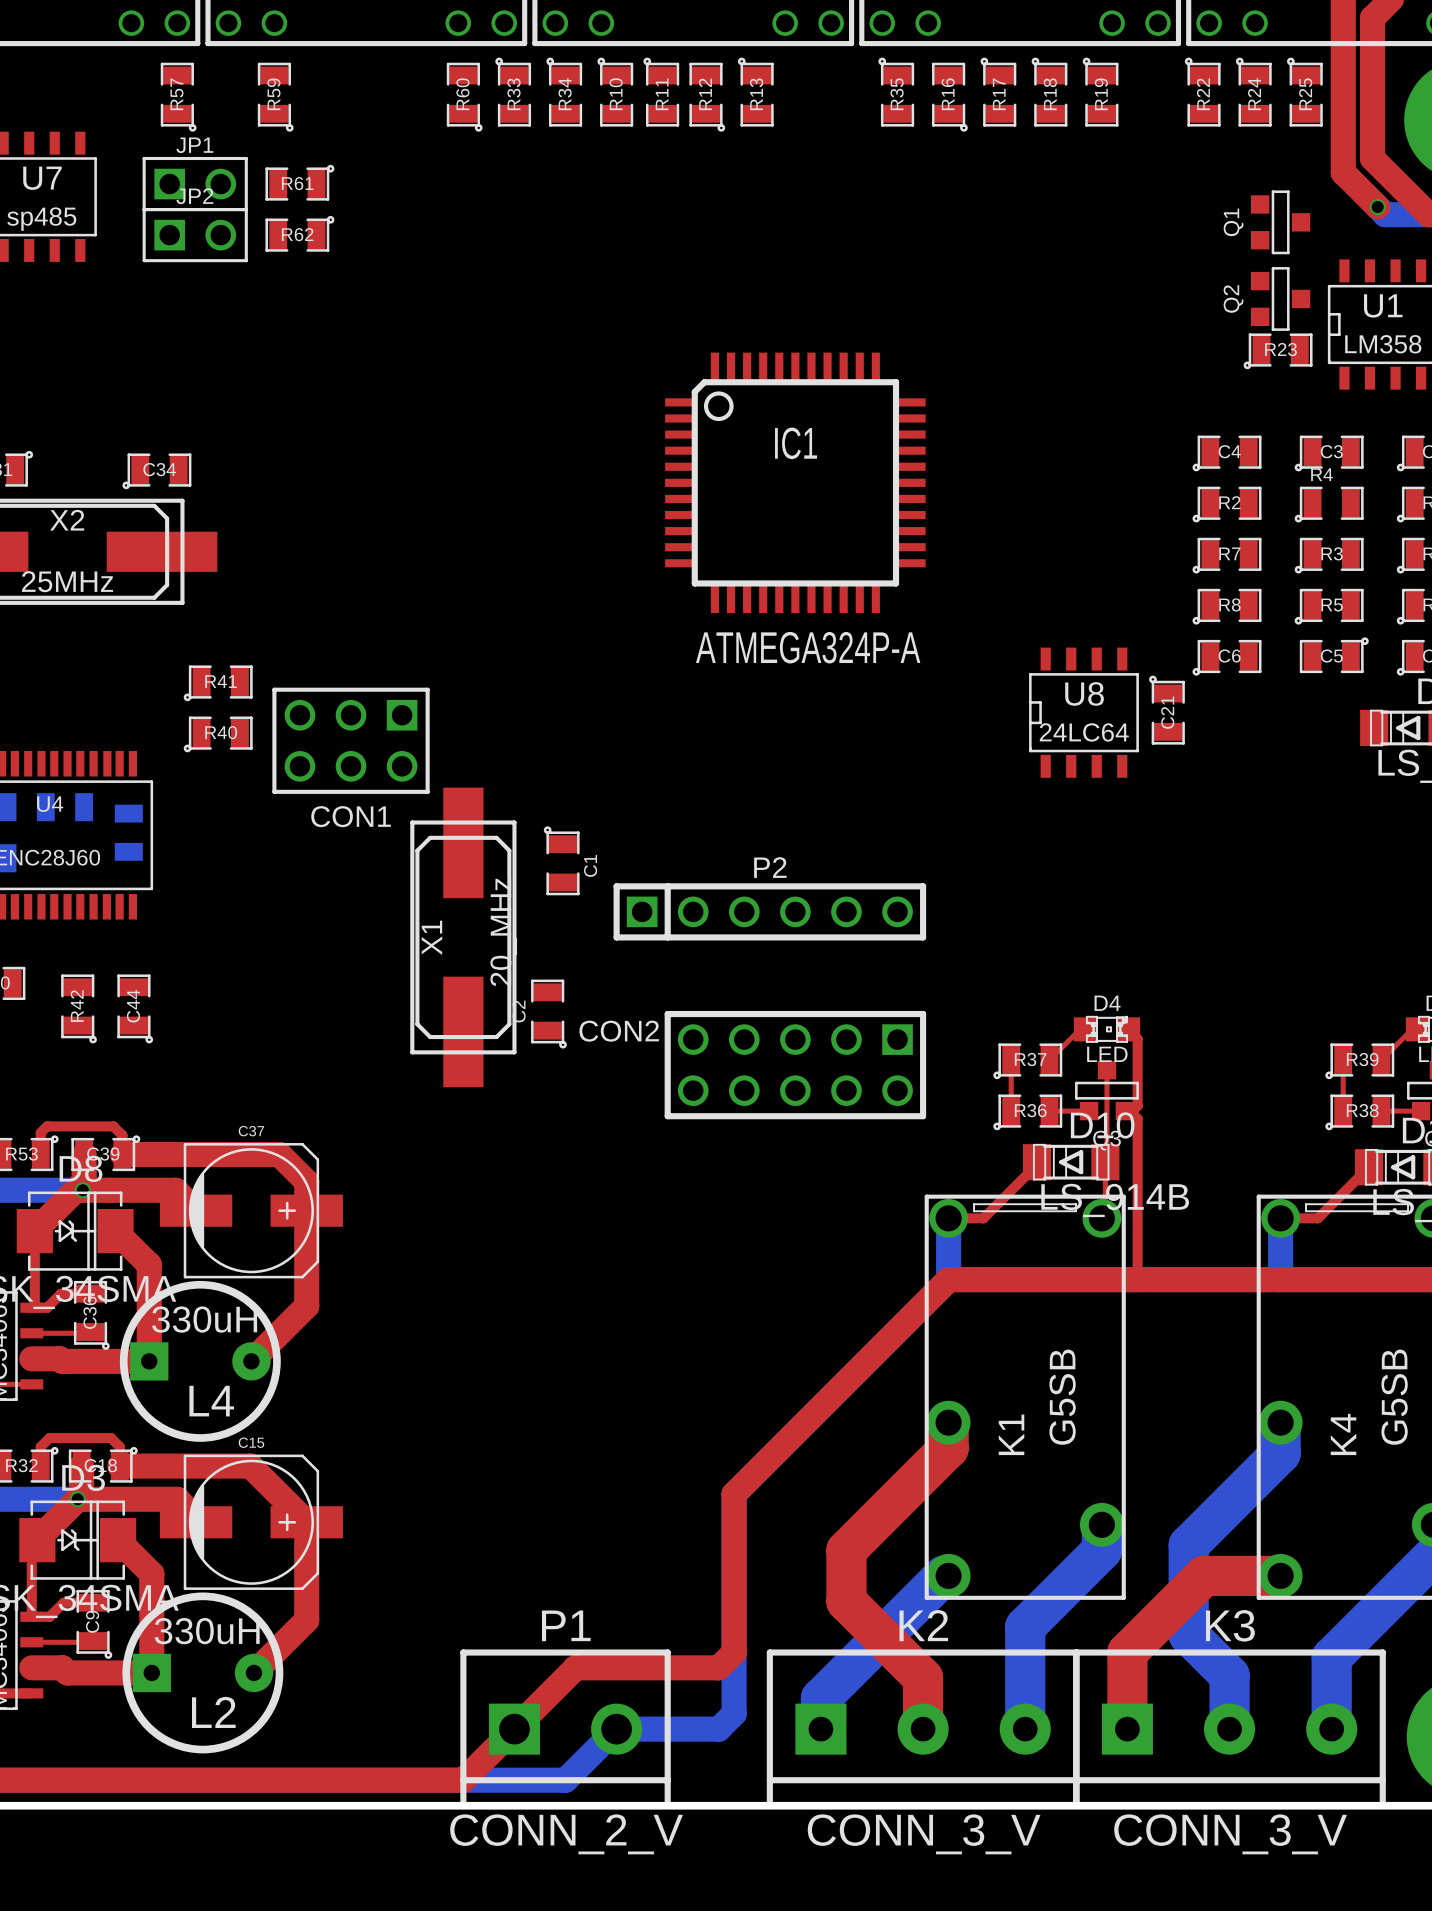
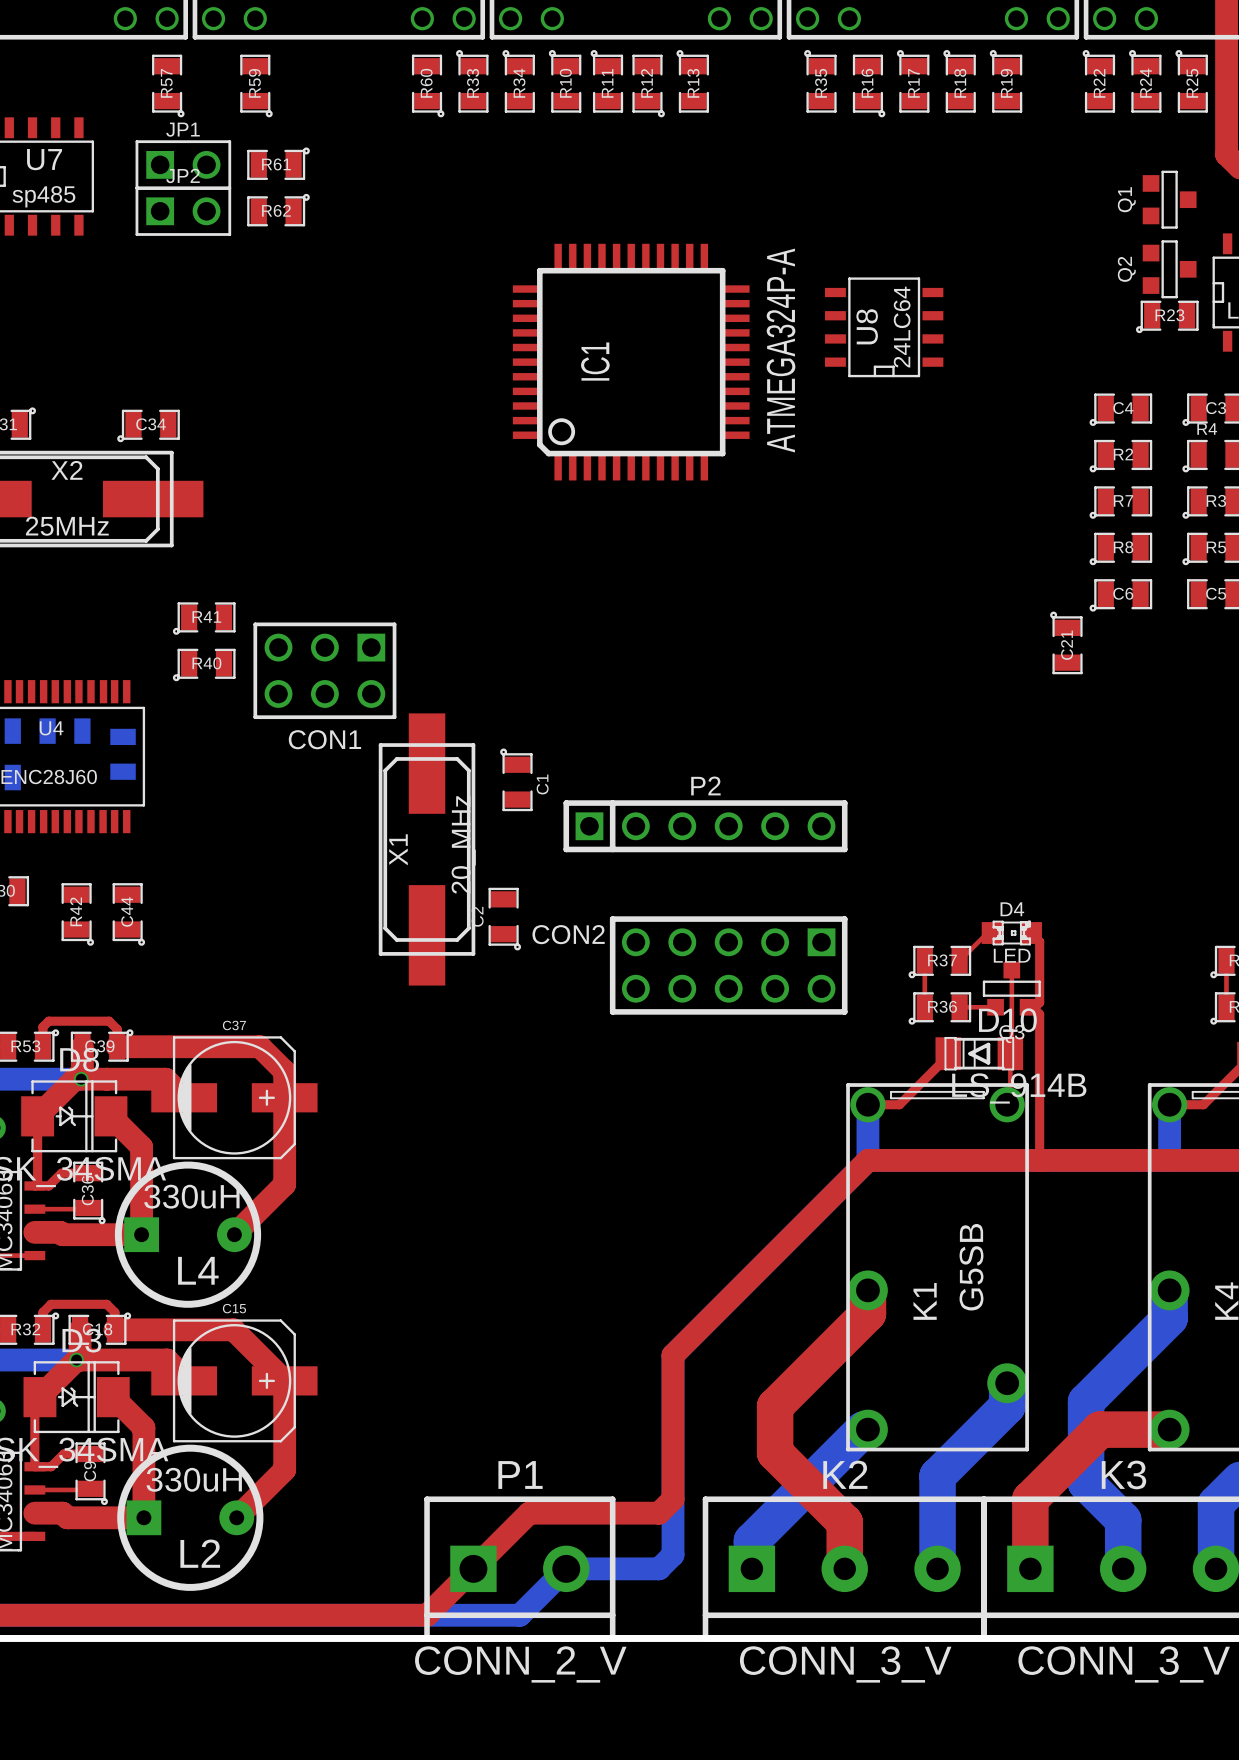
IC1 rotation: 0° (795, 482) -> 90° counterclockwise (631, 362)
U8 rotation: 0° (1083, 712) -> 90° counterclockwise (884, 327)
U8 position: (1083, 712) -> (884, 327)

